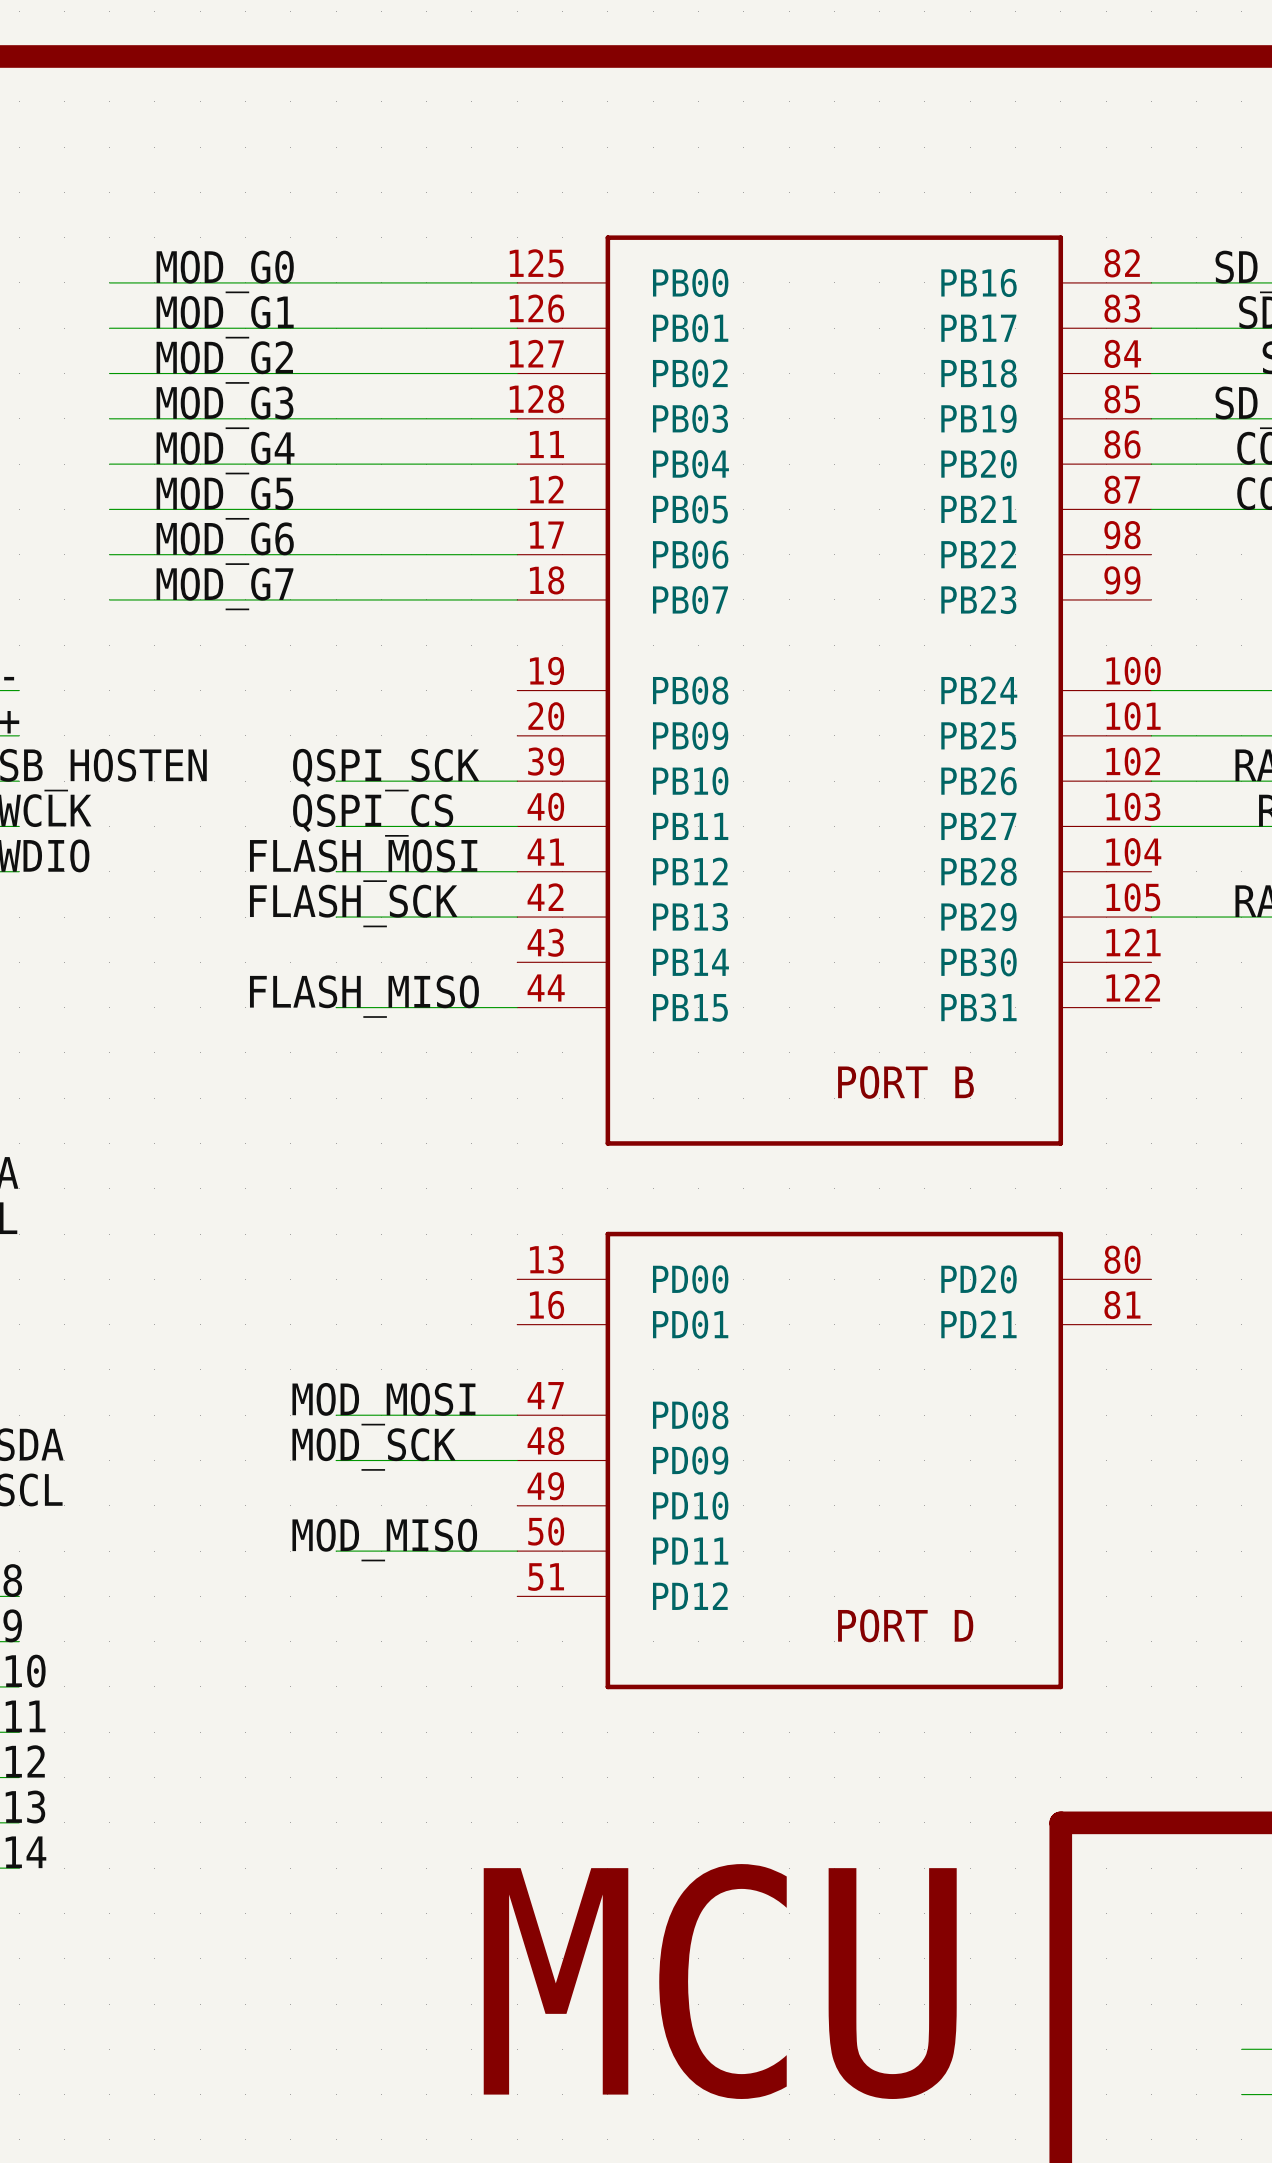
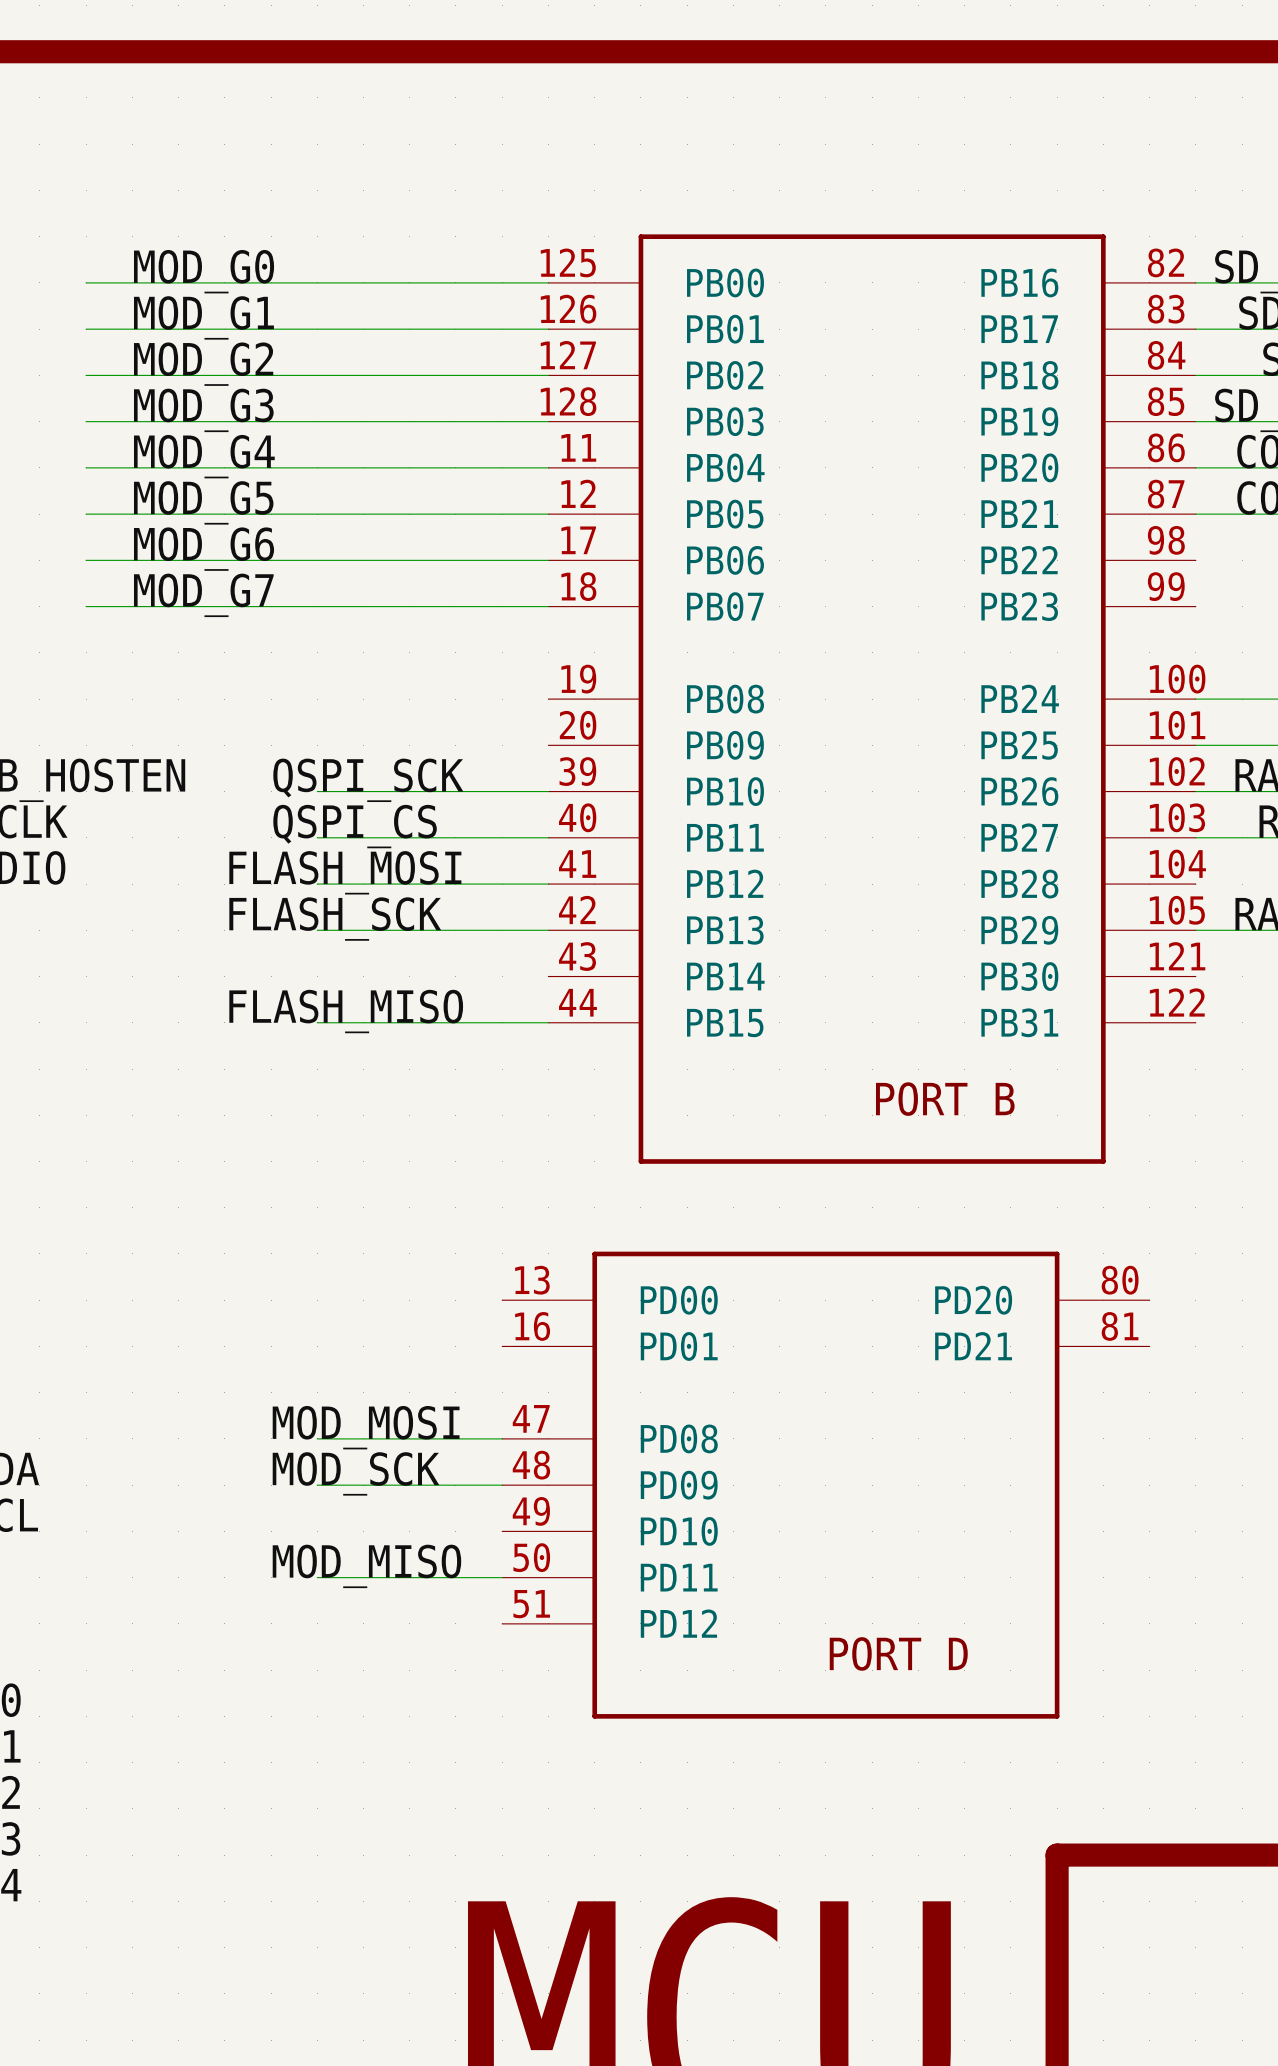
part position: (834, 690) -> (872, 699)

